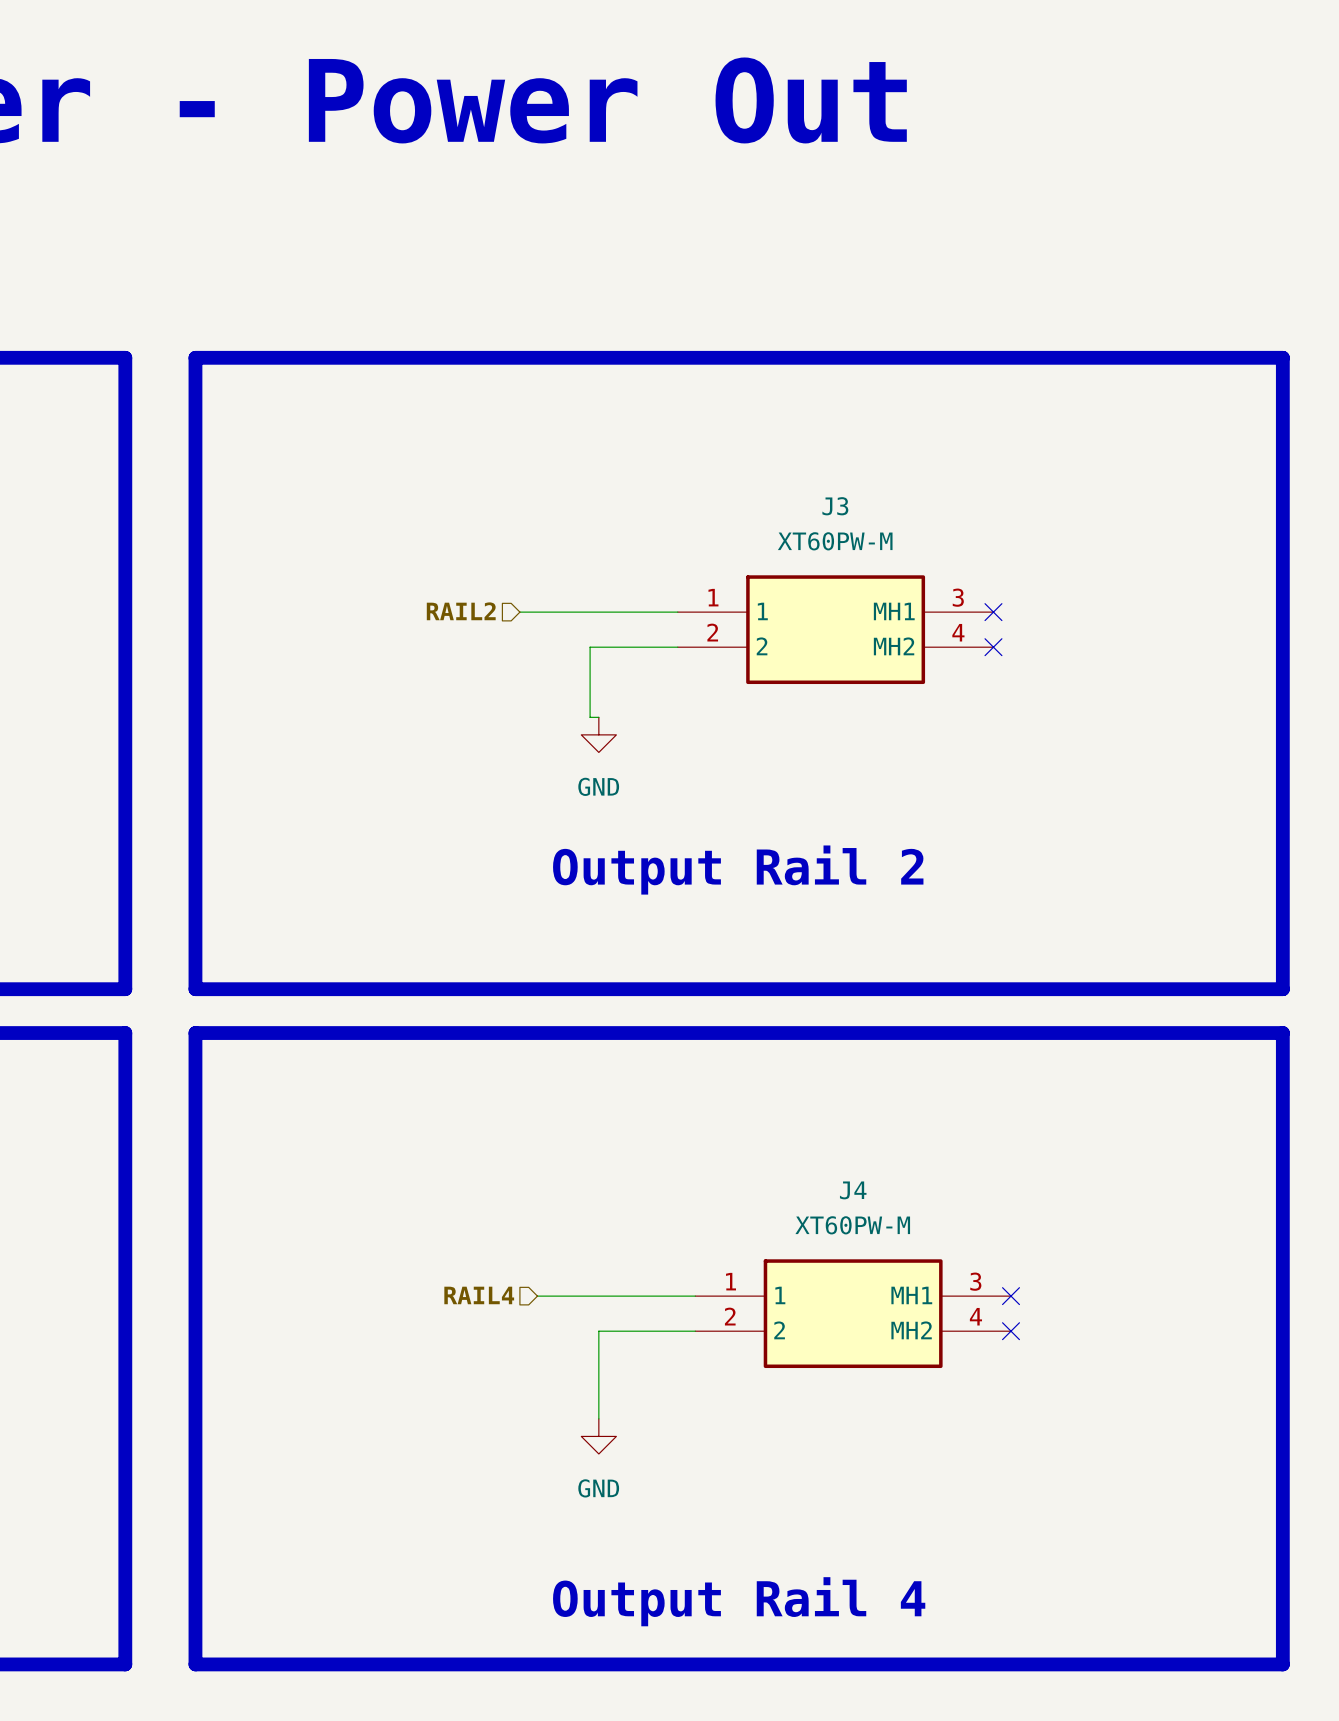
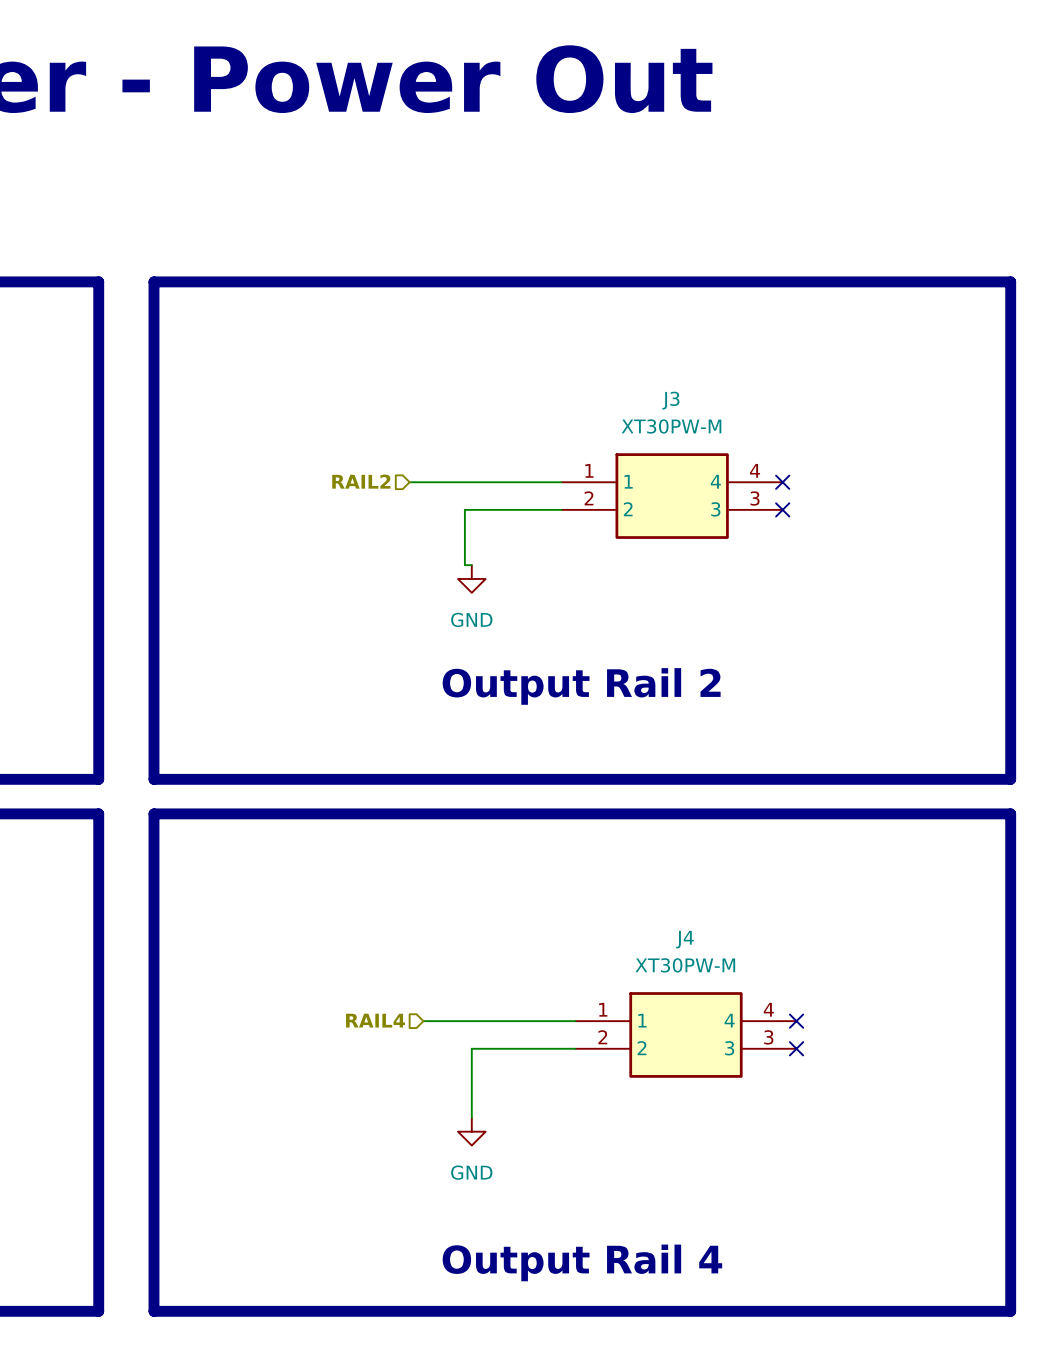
J3 value: XT60PW-M (835, 541) -> XT30PW-M (671, 426)
J3 symbol: [677, 575, 994, 685] -> [561, 453, 783, 539]
J4 value: XT60PW-M (852, 1225) -> XT30PW-M (685, 965)
J4 symbol: [695, 1259, 1012, 1369] -> [575, 992, 797, 1078]

